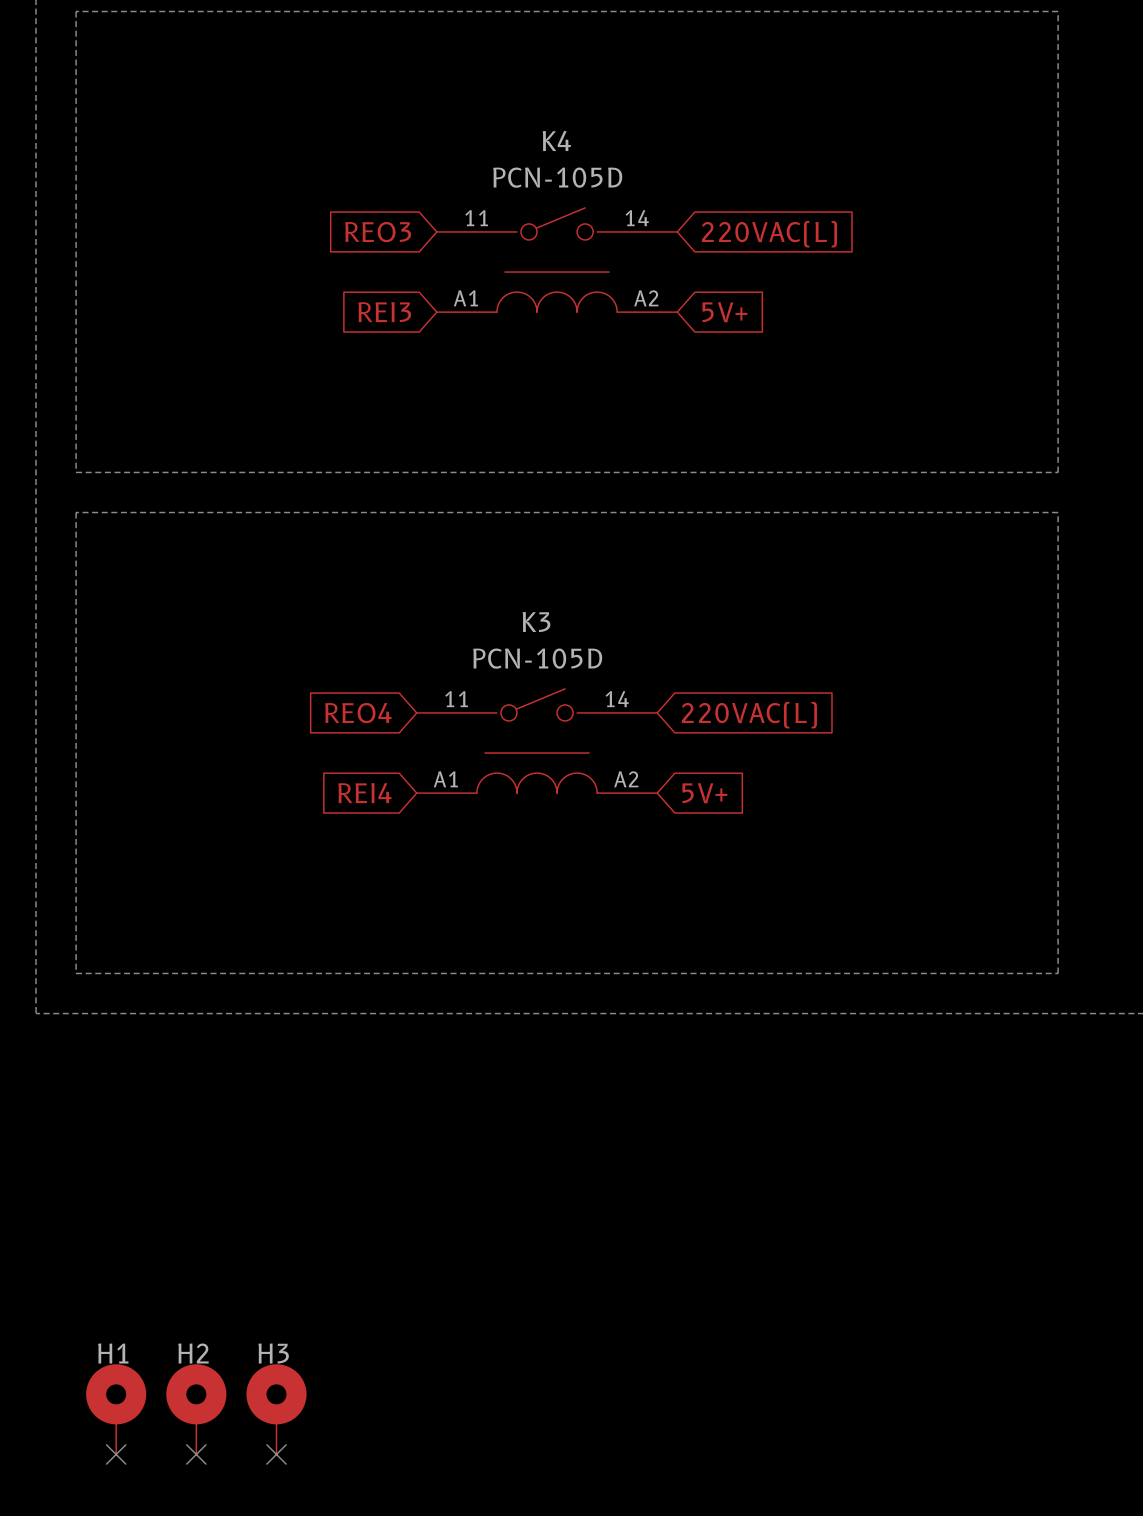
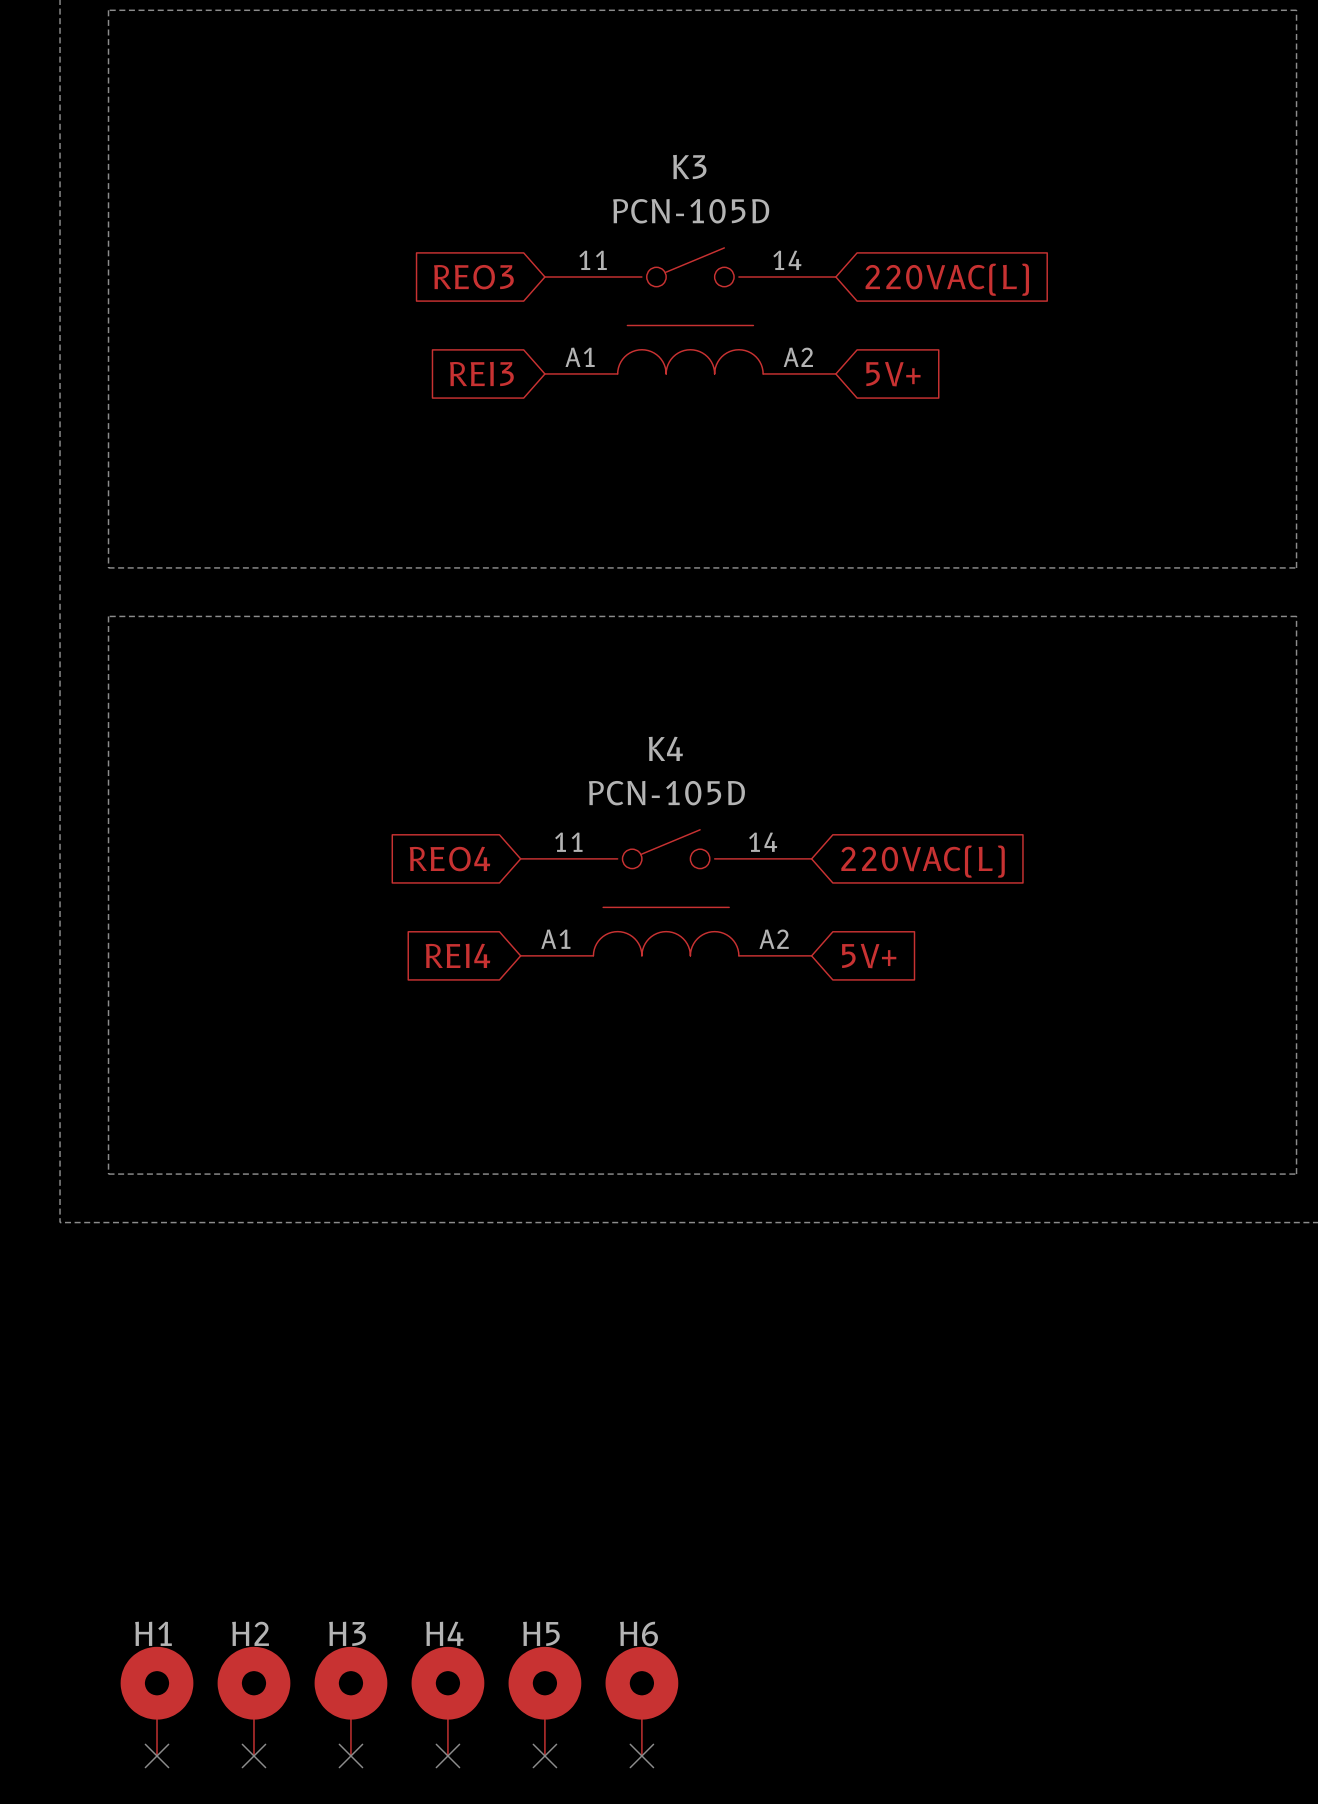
K4 name: K4 (556, 141) -> K3 (689, 166)
K3 name: K3 (536, 622) -> K4 (665, 748)
H4: none -> (447, 1701)
H5: none -> (544, 1701)
H6: none -> (641, 1701)
no-connect mark: none -> (447, 1755)
no-connect mark: none -> (544, 1755)
no-connect mark: none -> (641, 1755)

